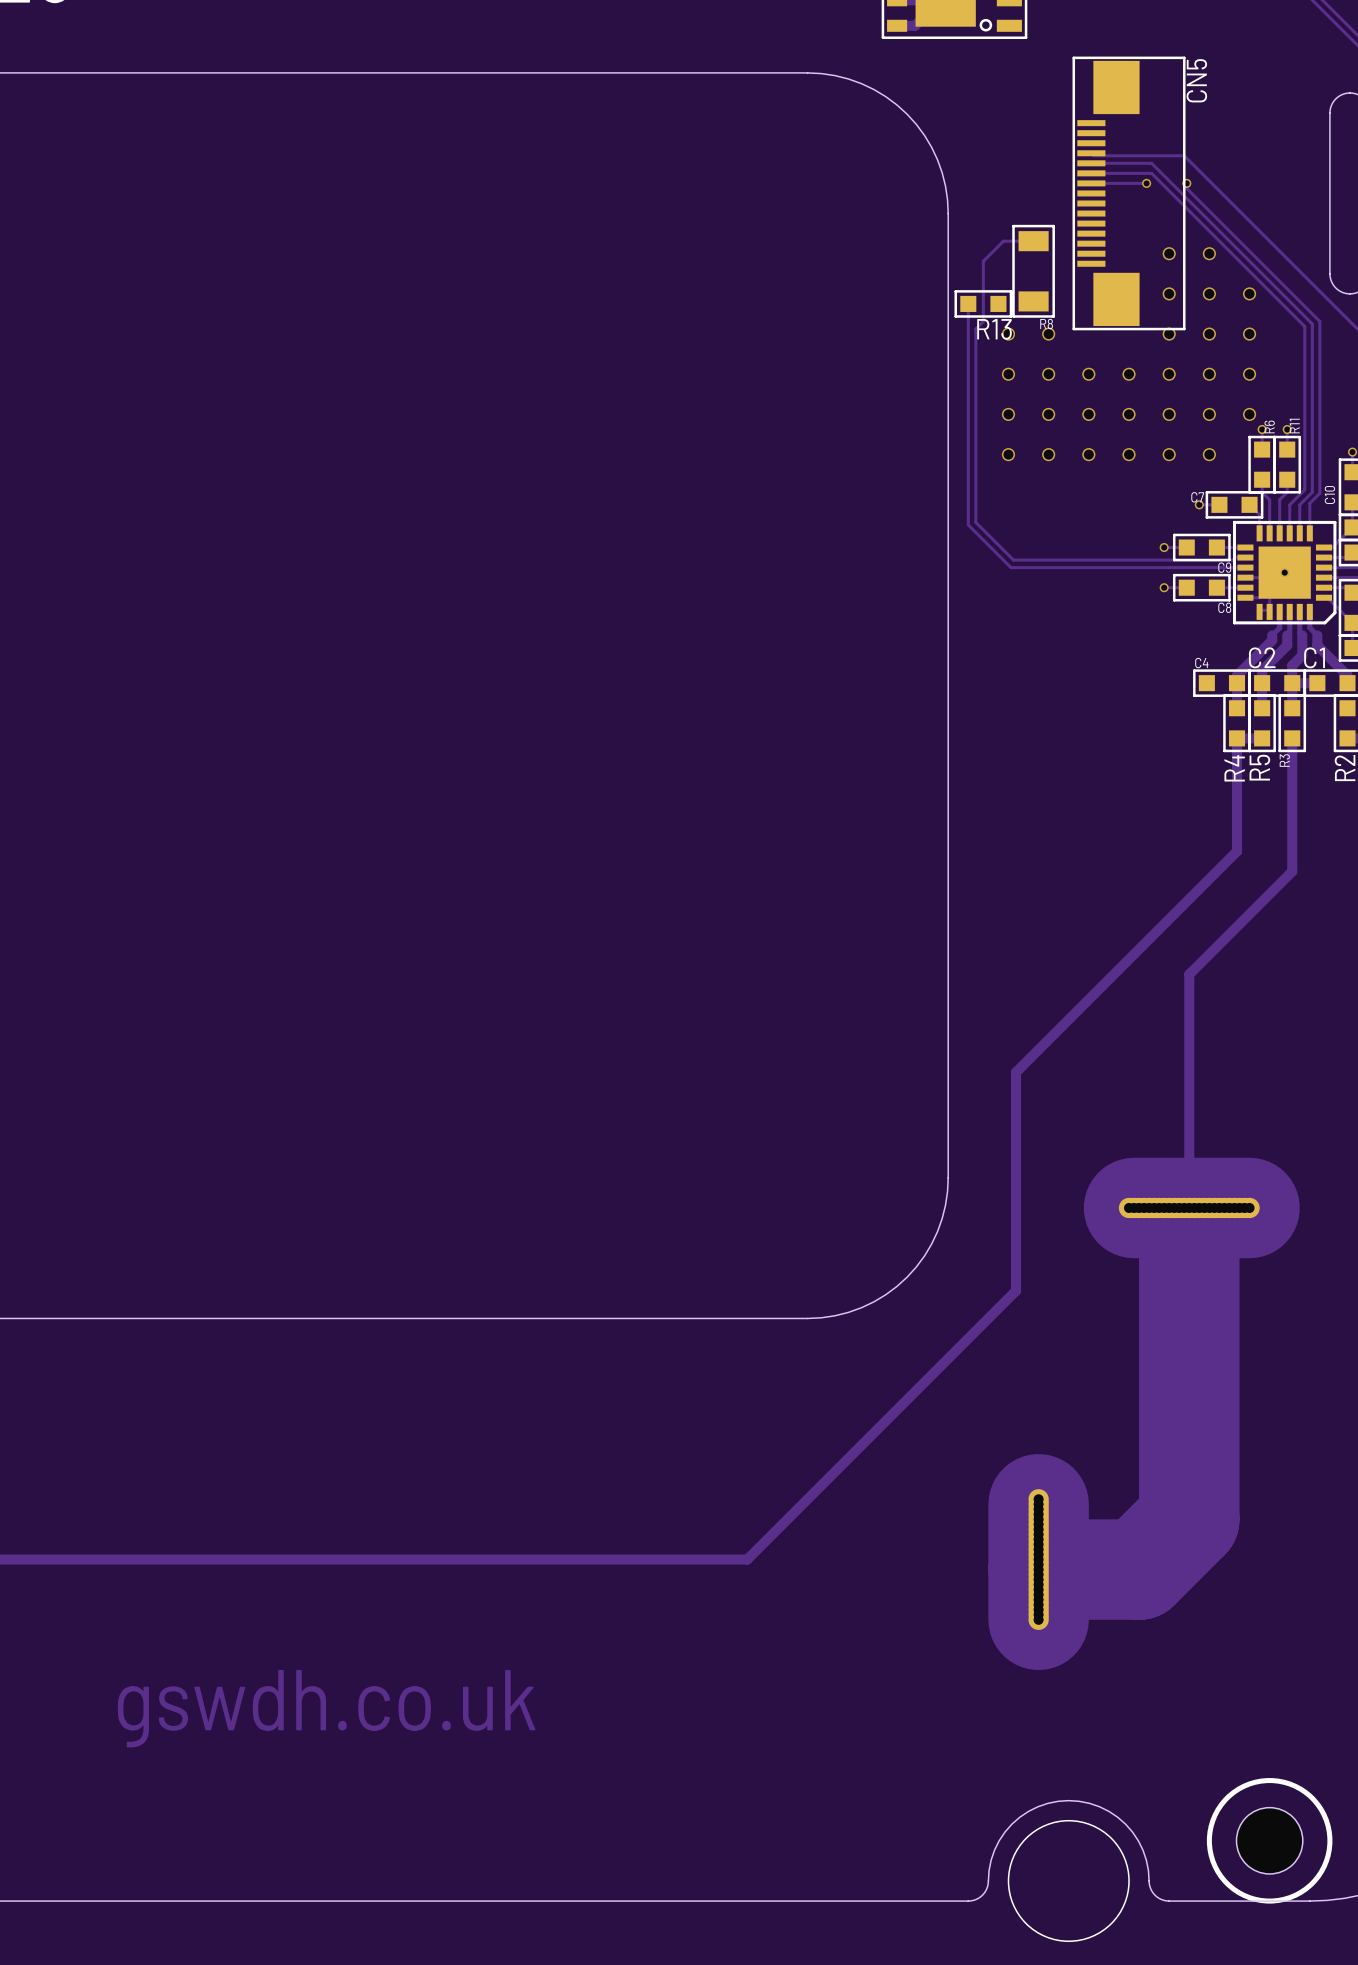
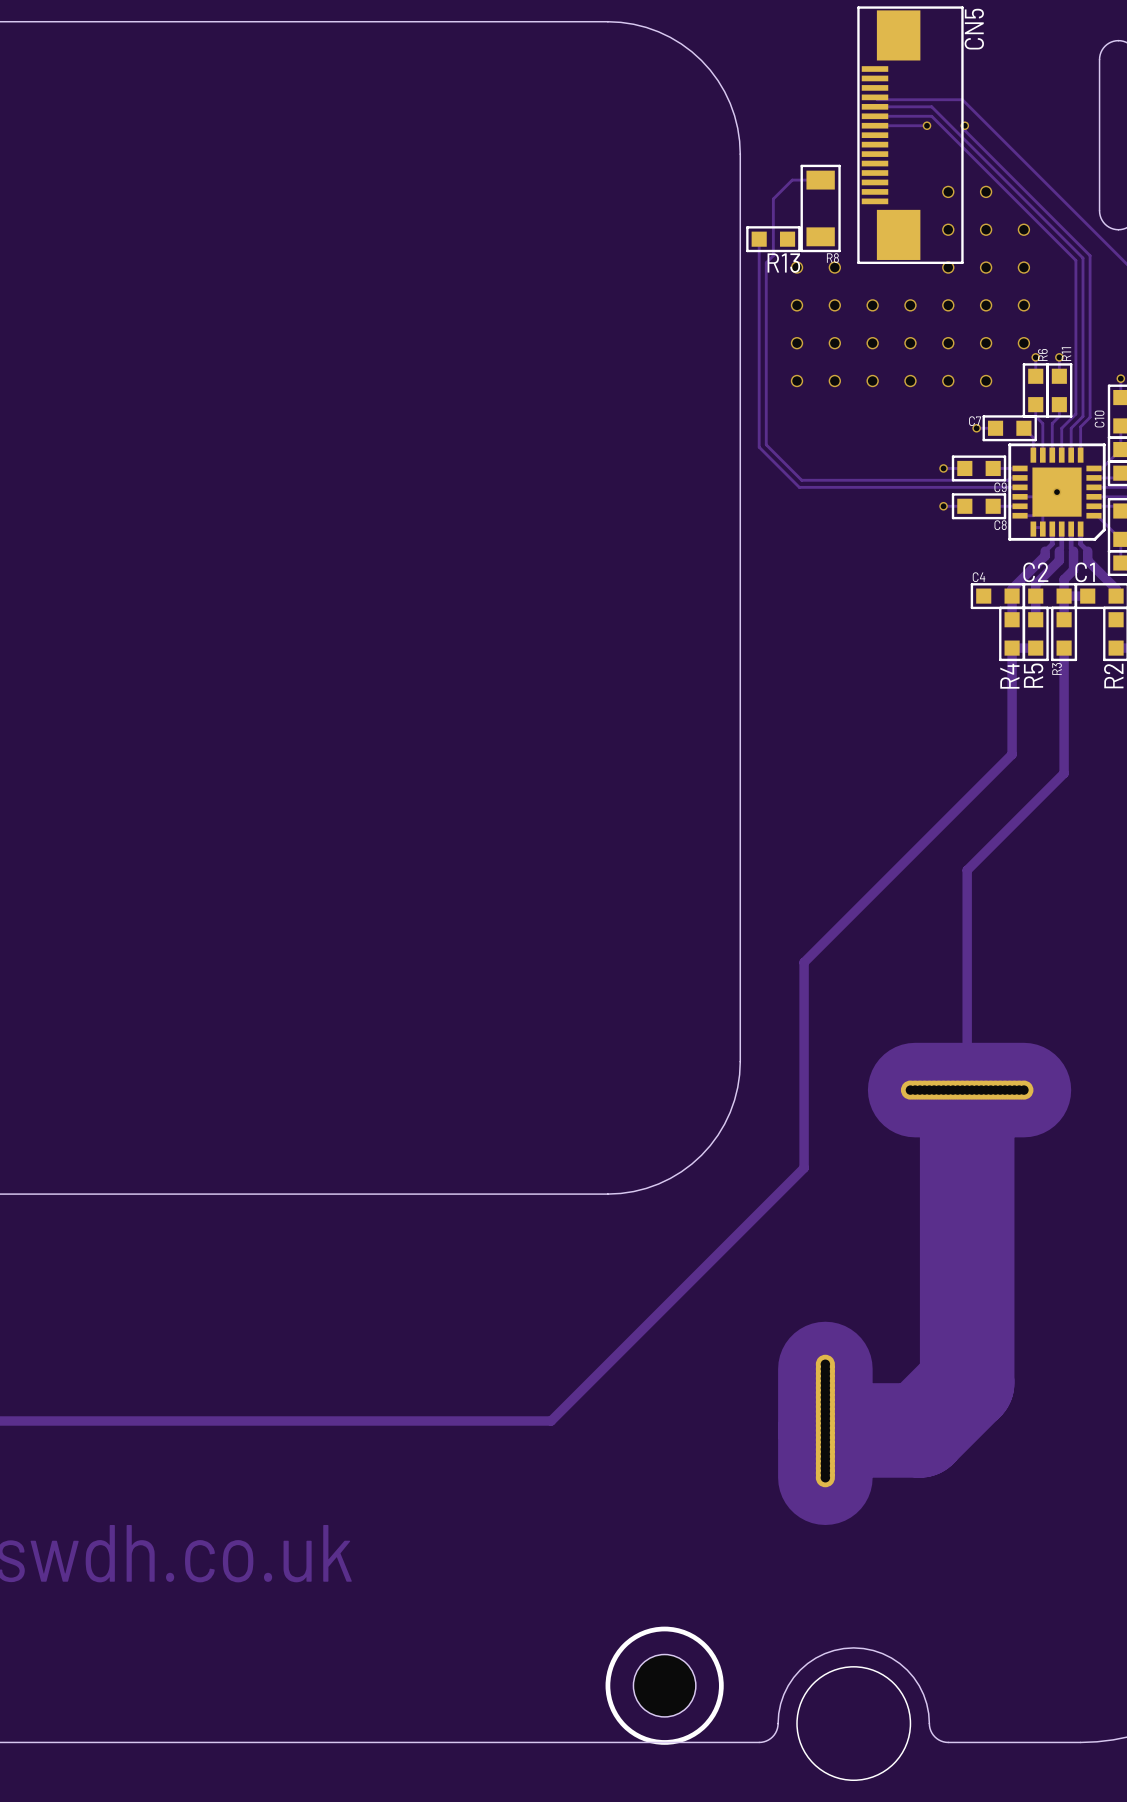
part position: (1269, 1840) -> (664, 1685)

